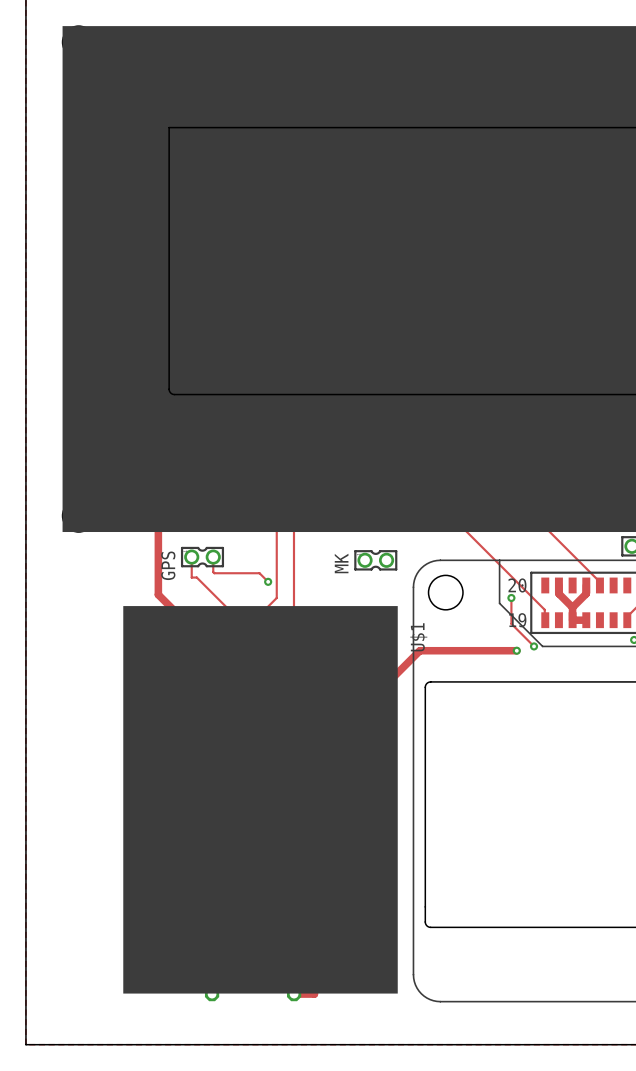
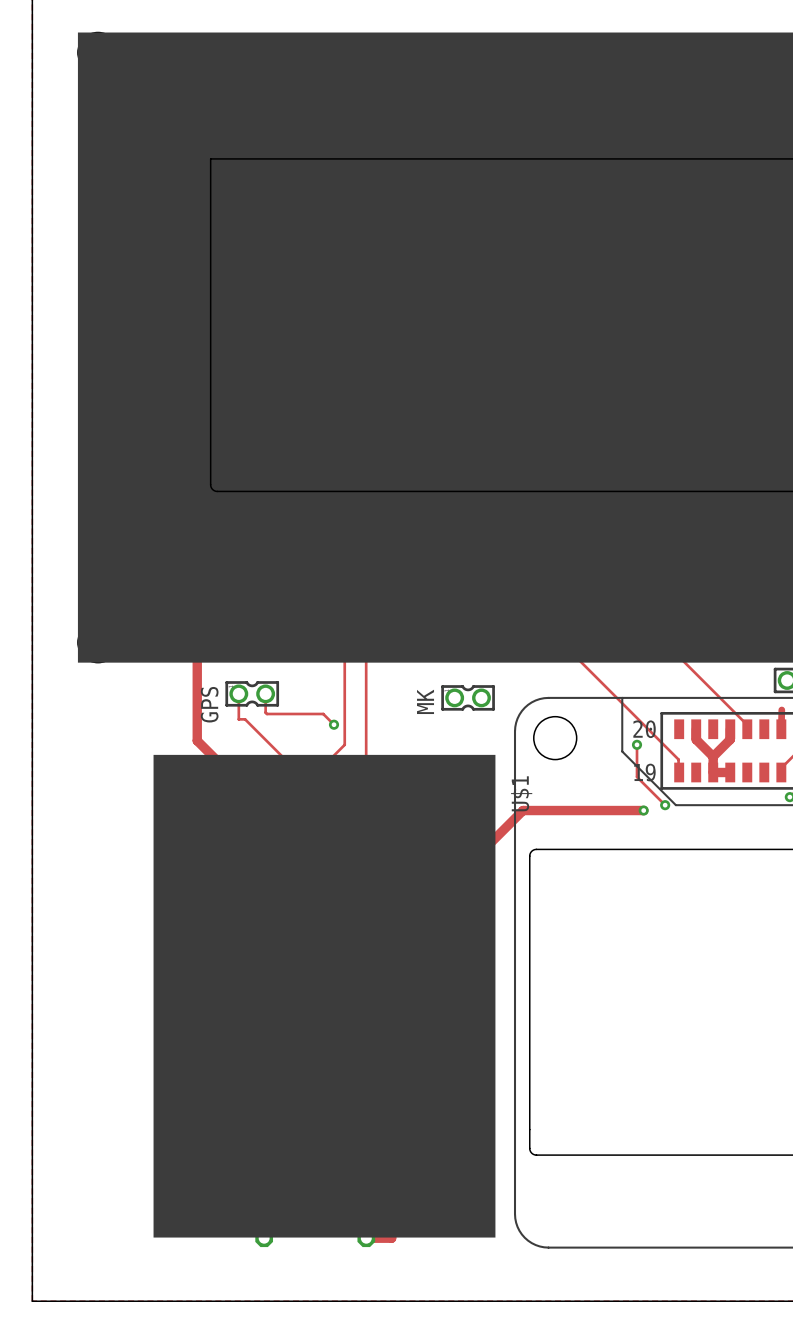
track: none -> (781, 709) (781, 729)

